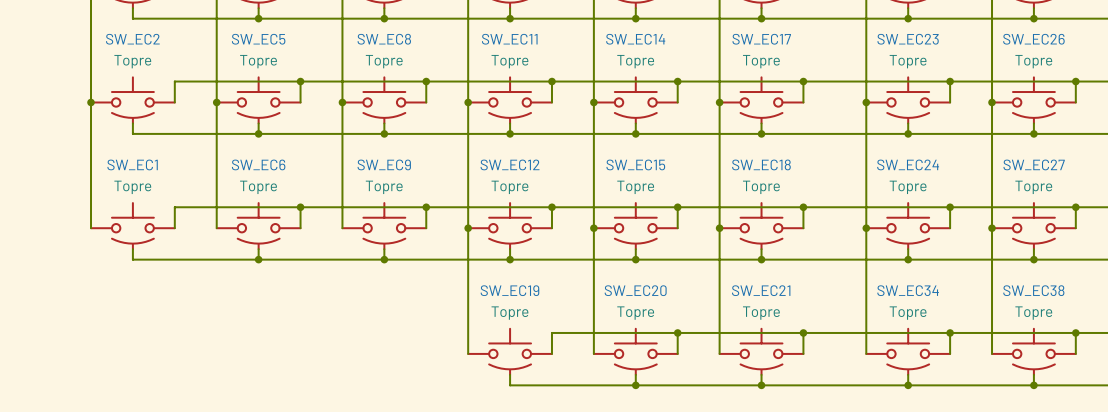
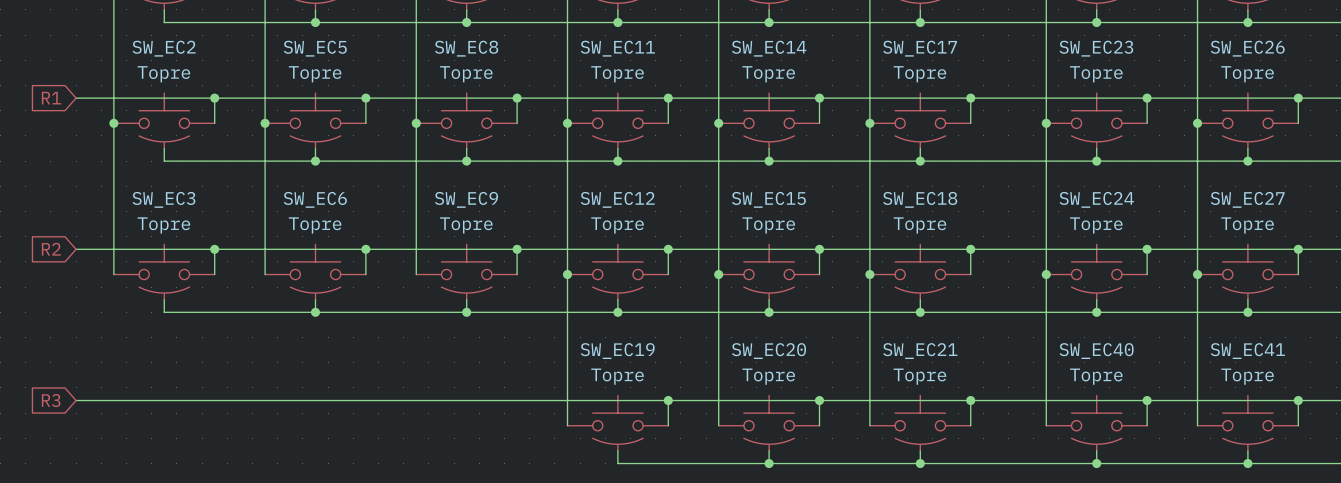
global label: none -> R1 (51, 98)
wire: none -> (76, 98) (214, 98)
junction: none -> (214, 98)
SW_EC1 name: SW_EC1 (132, 164) -> SW_EC3 (163, 199)
global label: none -> R2 (51, 249)
wire: none -> (76, 249) (214, 249)
junction: none -> (214, 249)
SW_EC34 name: SW_EC34 (908, 290) -> SW_EC40 (1096, 351)
SW_EC38 name: SW_EC38 (1033, 290) -> SW_EC41 (1247, 351)
wire: none -> (76, 400) (668, 400)
junction: none -> (668, 400)
global label: none -> R3 (51, 400)

